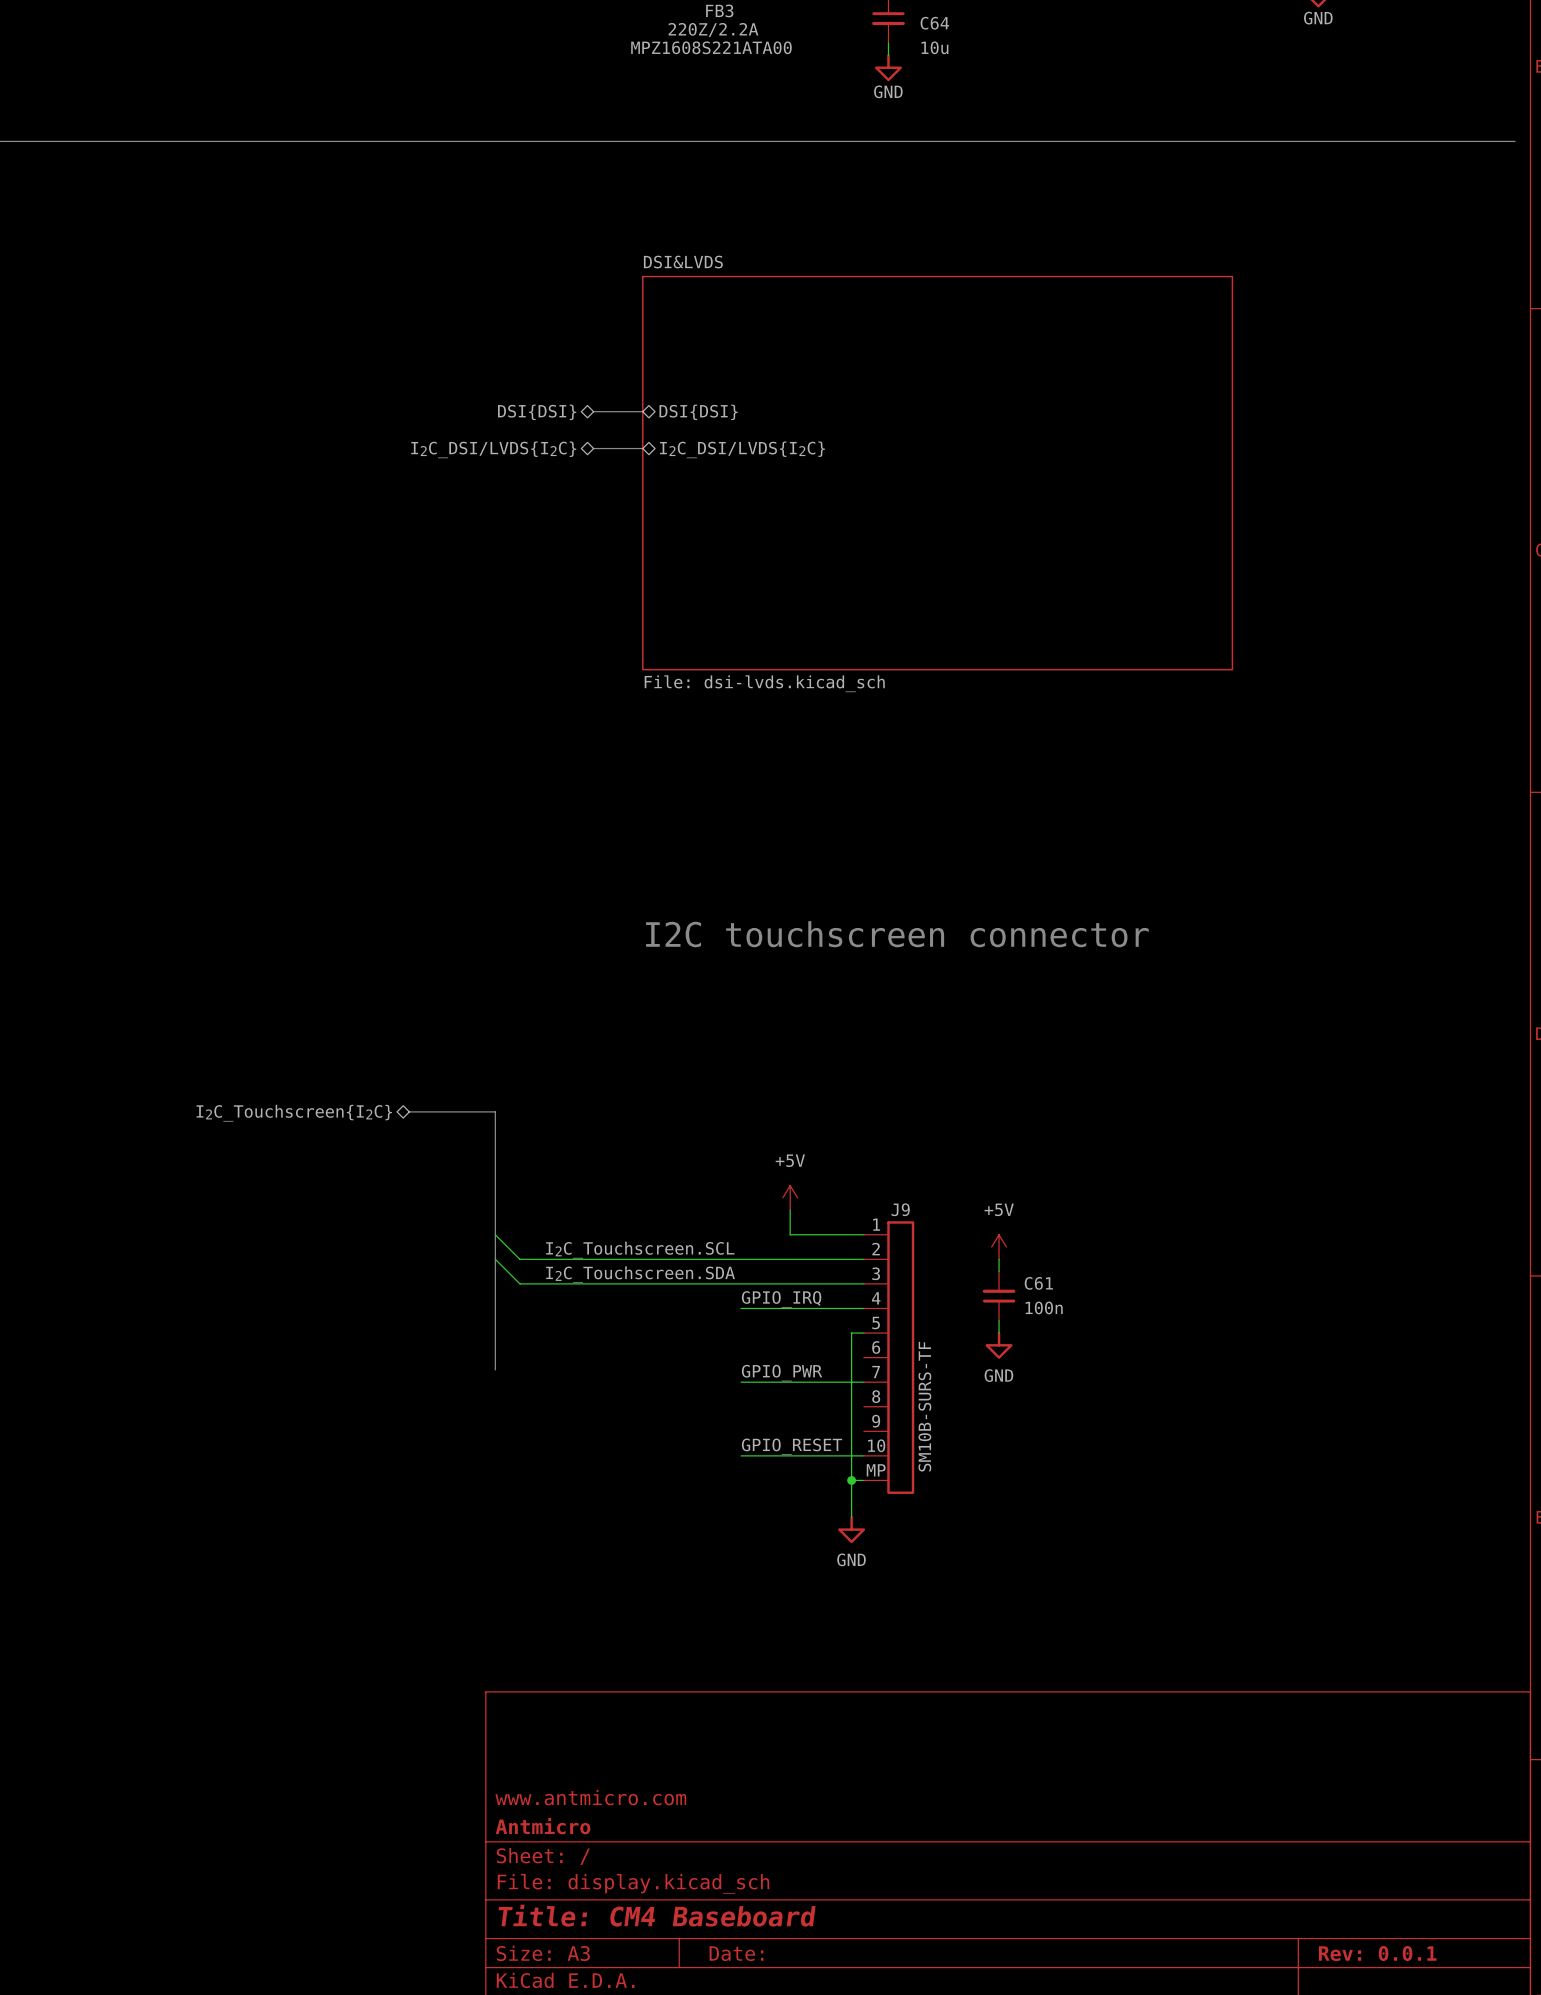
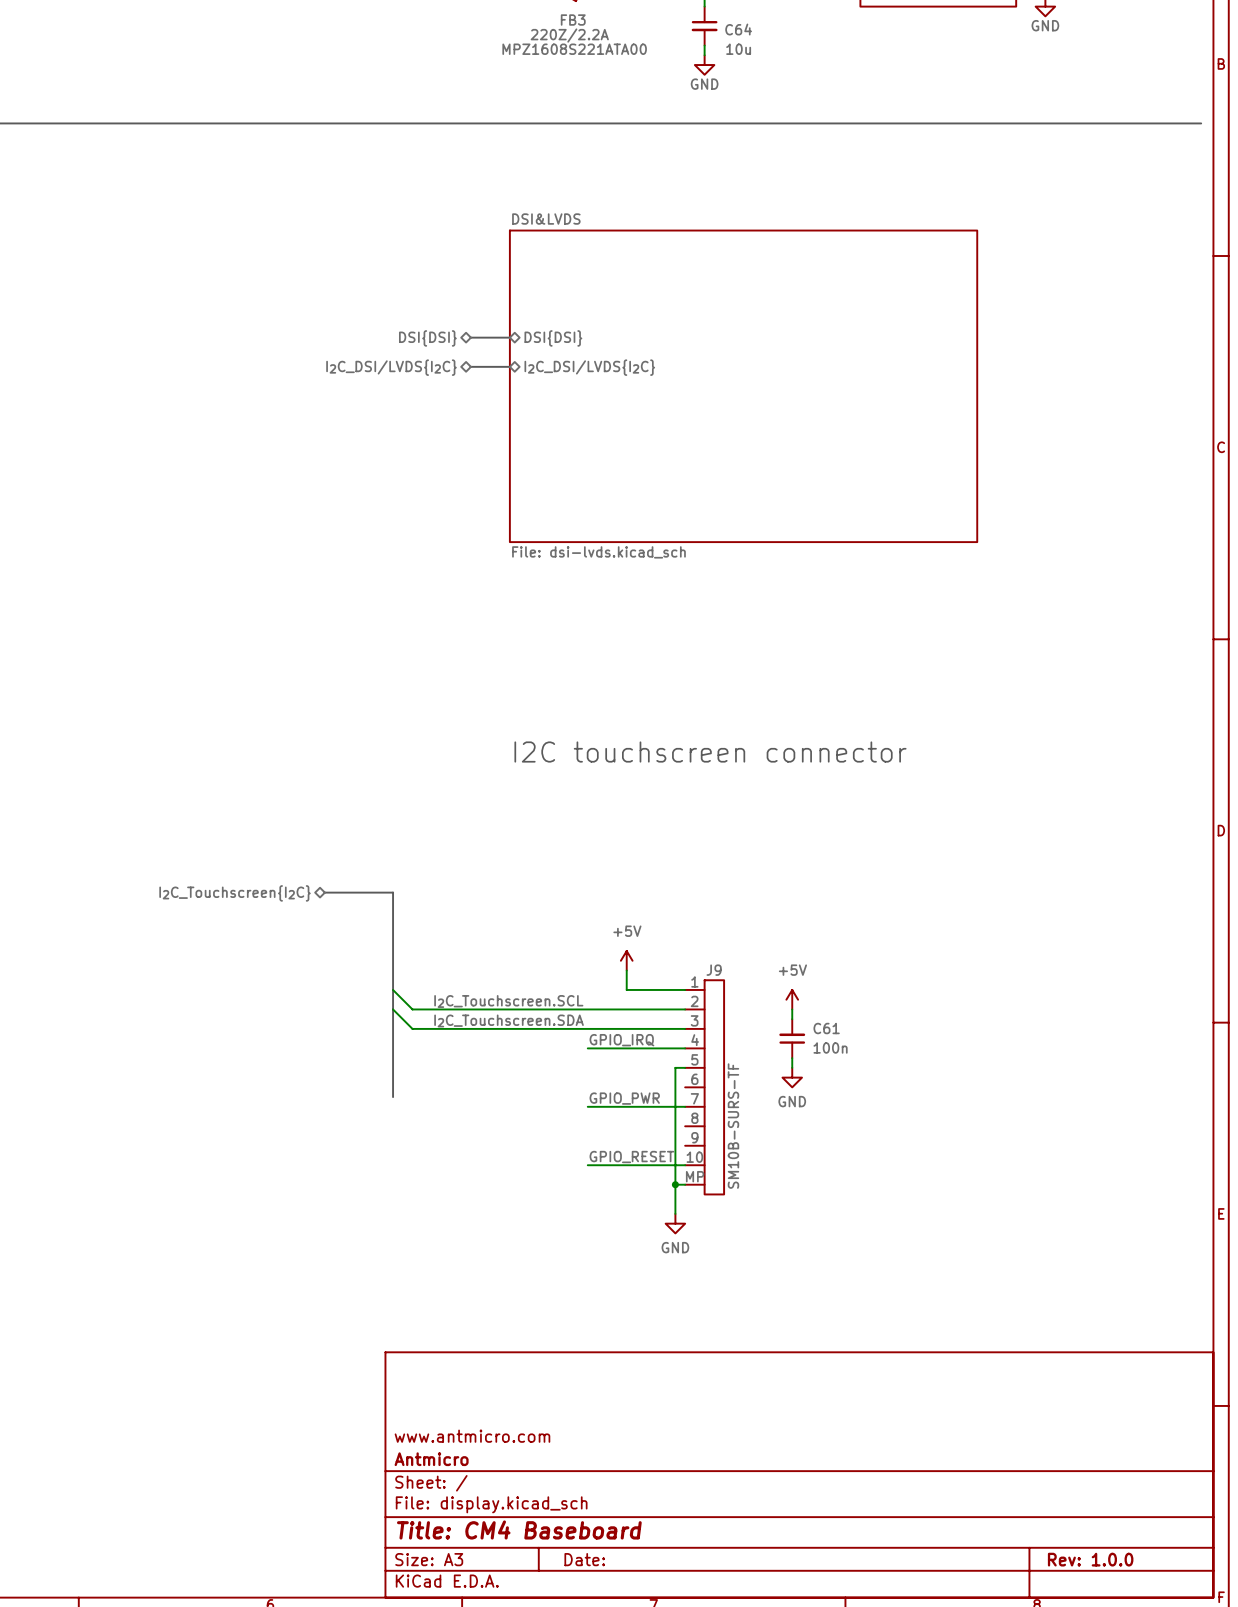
title block: Rev: 0.0.1 (1377, 1953) -> Rev: 1.0.0 (1090, 1559)

